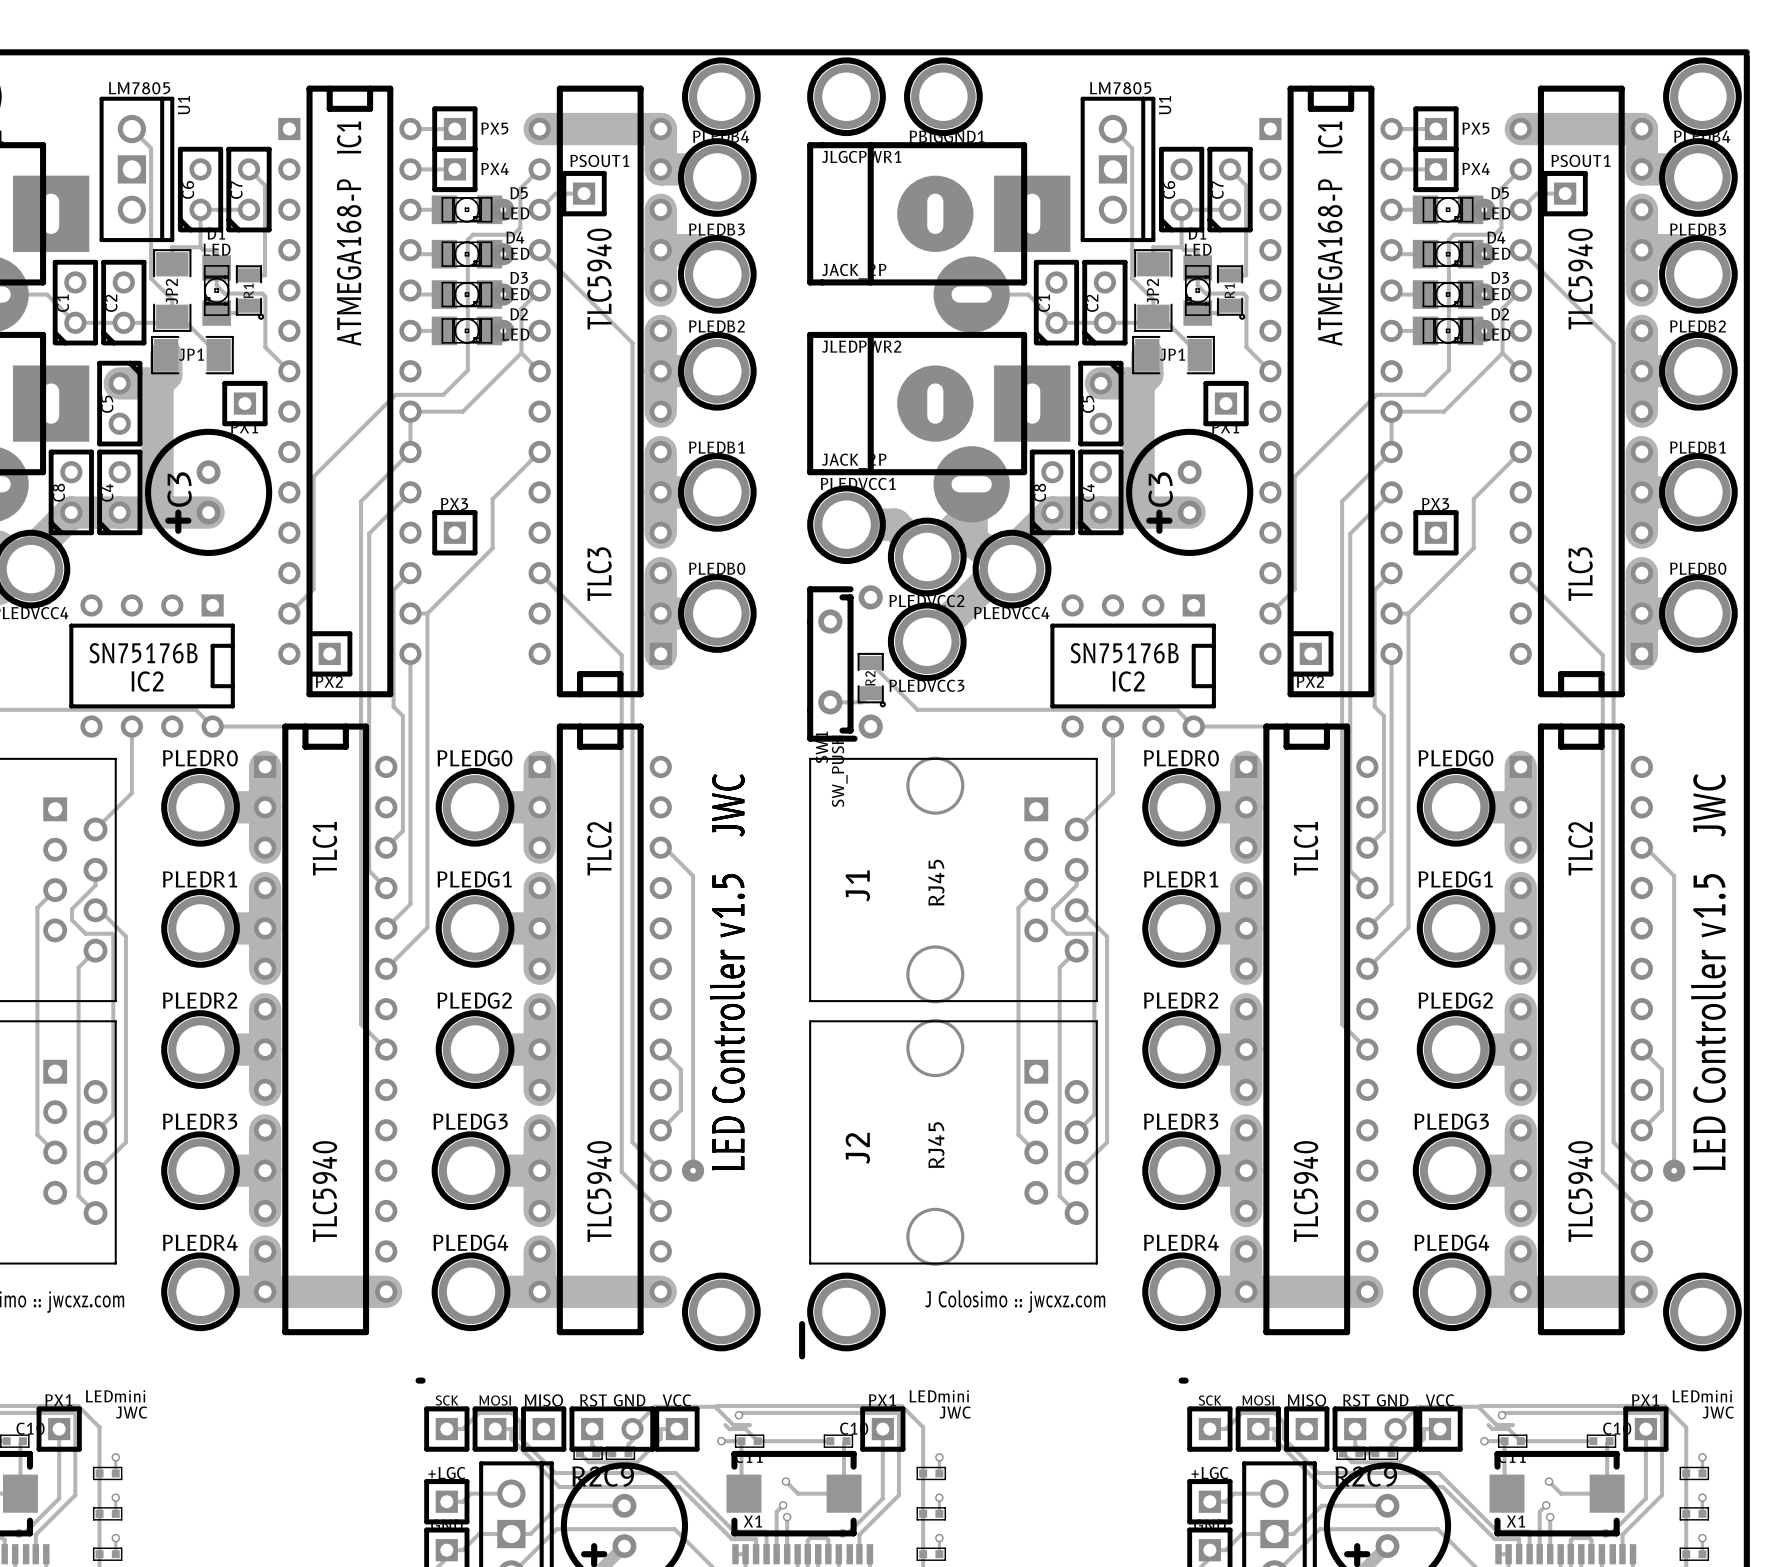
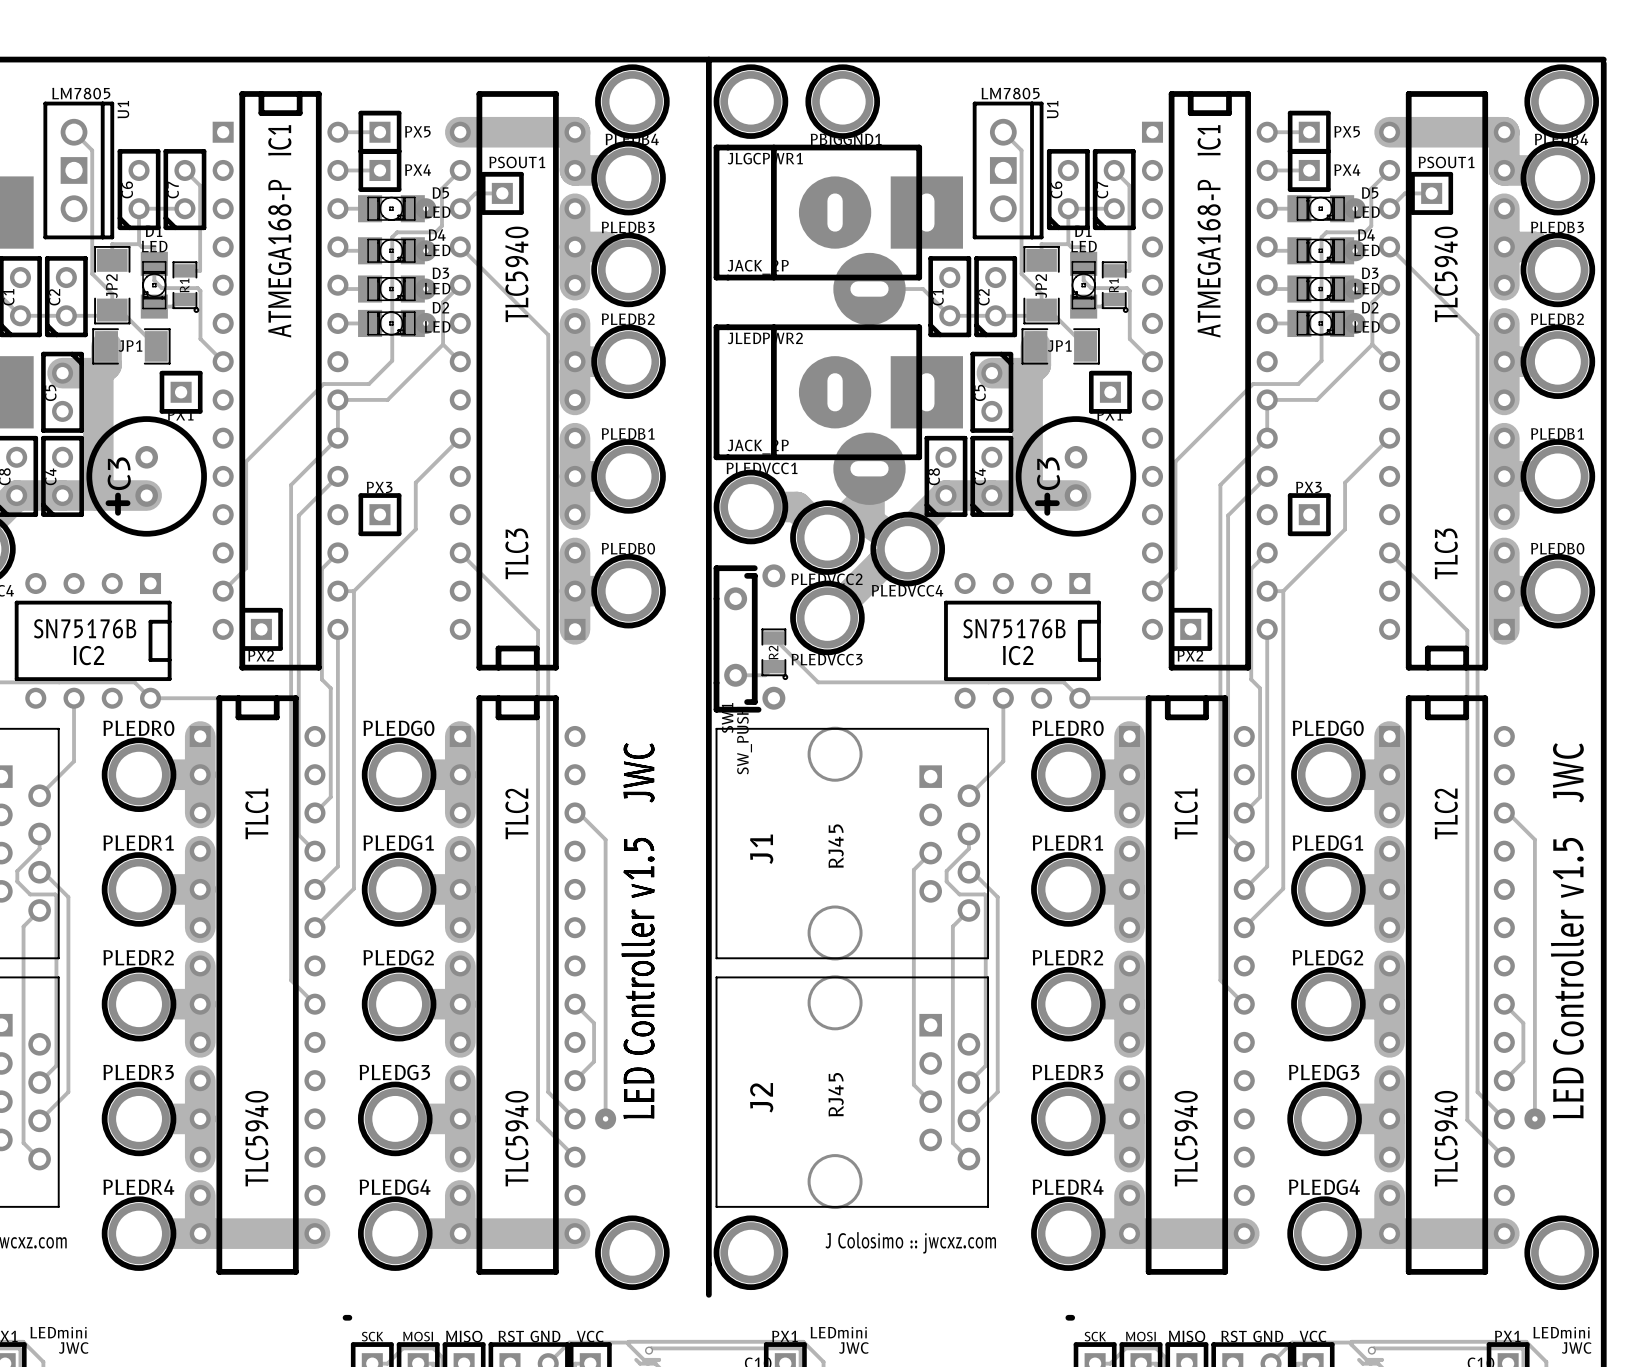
board edge: none -> (708, 59) (708, 1264)

